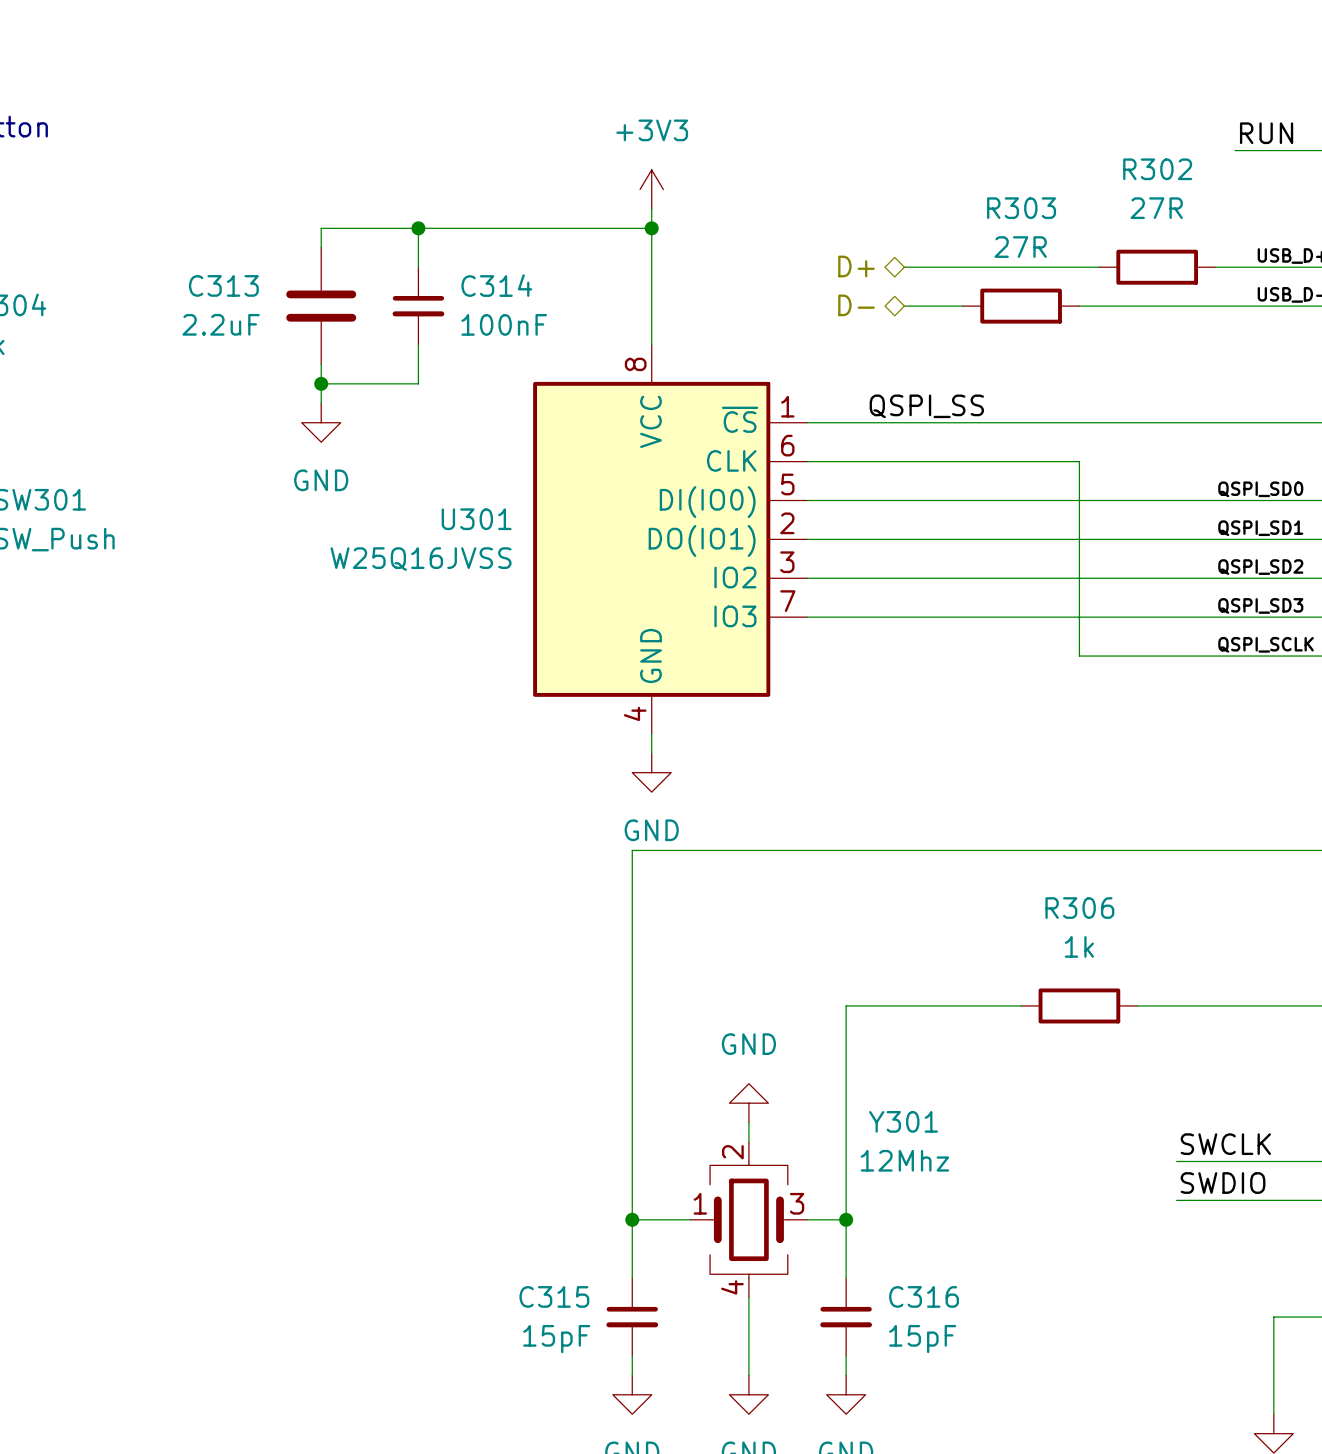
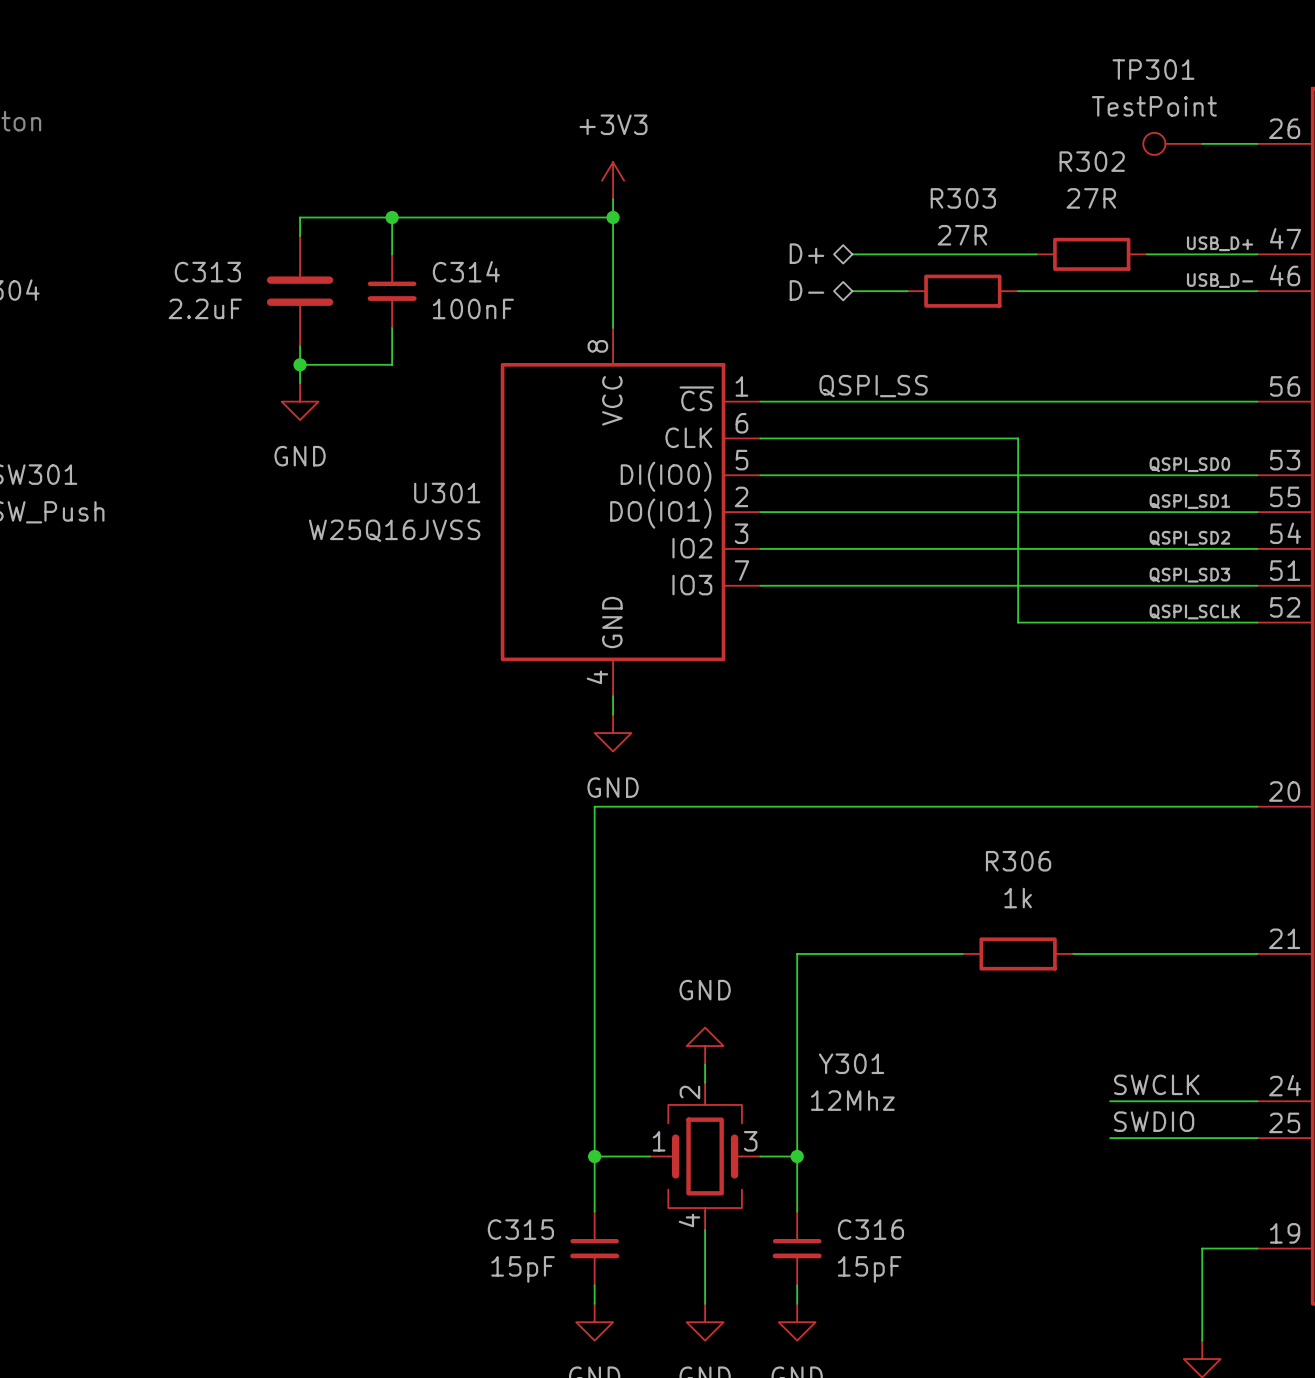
label: RUN (1266, 133) -> none
TP301: none -> TestPoint (1172, 143)

